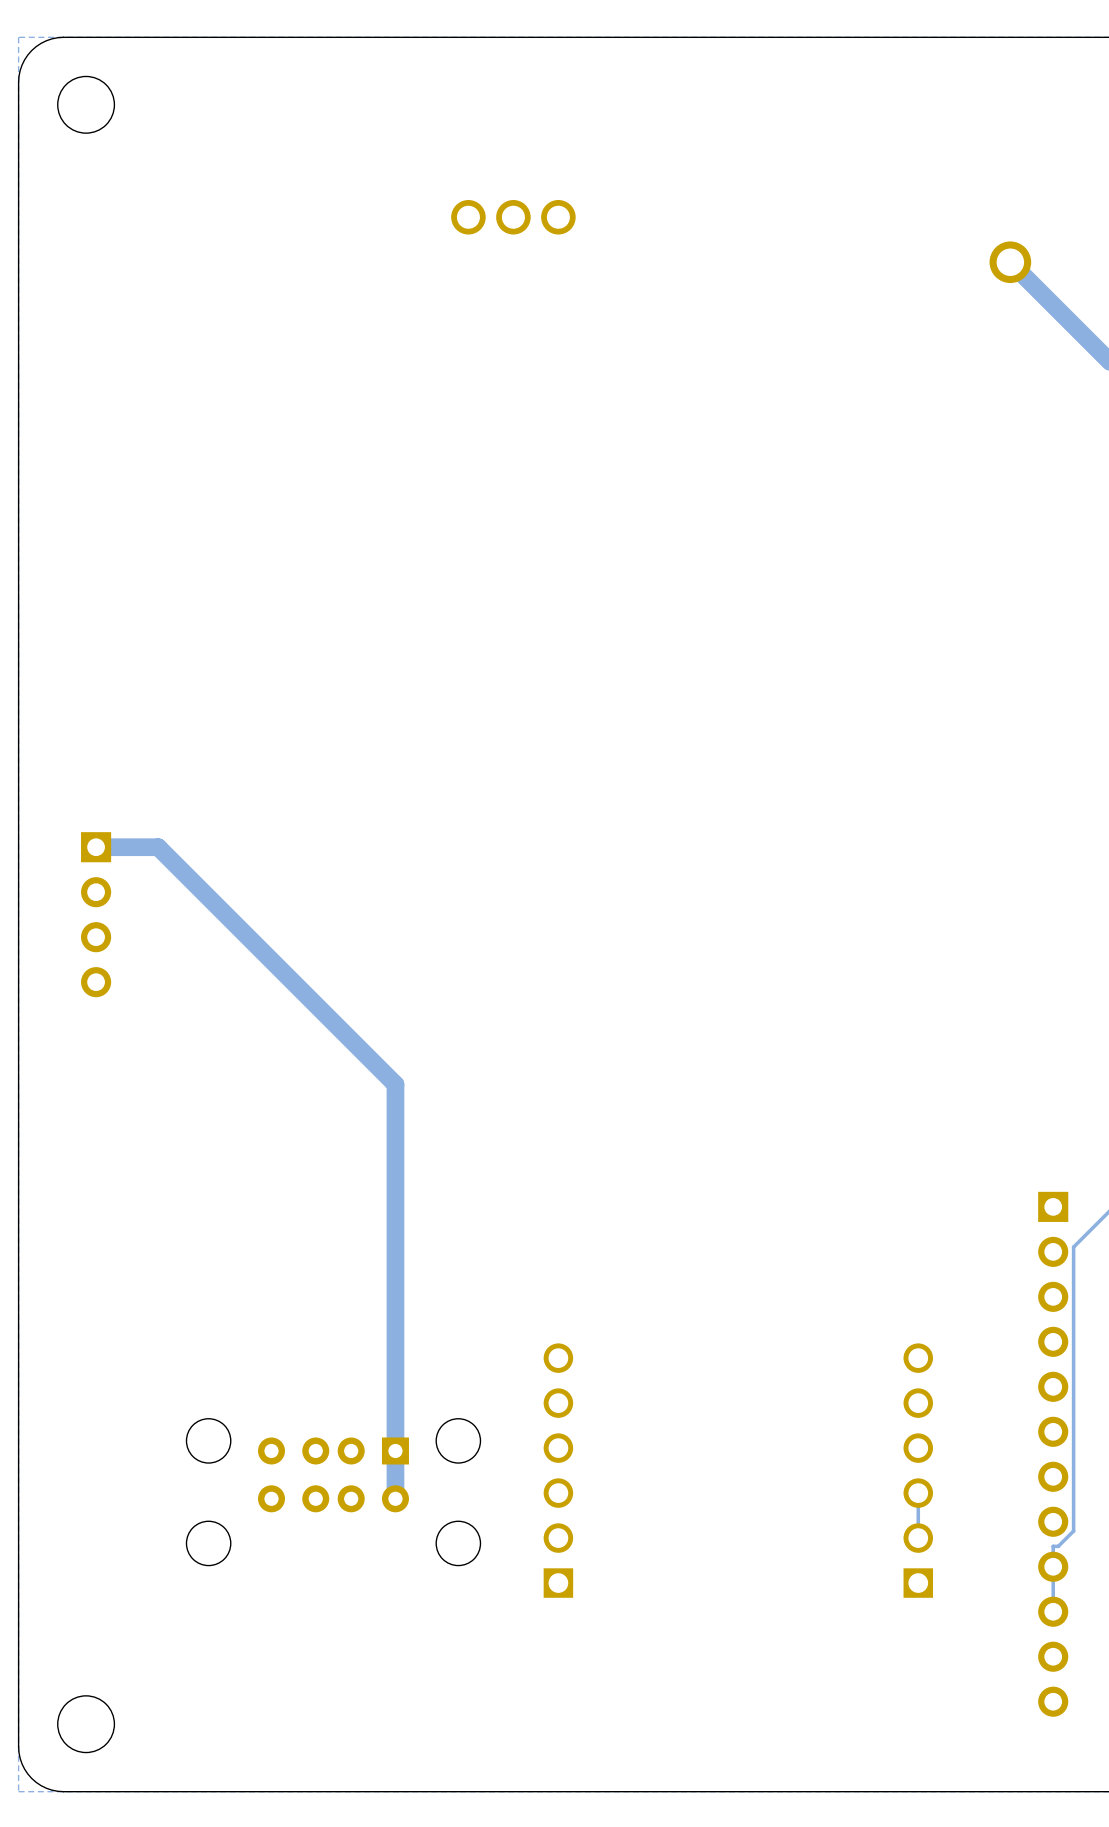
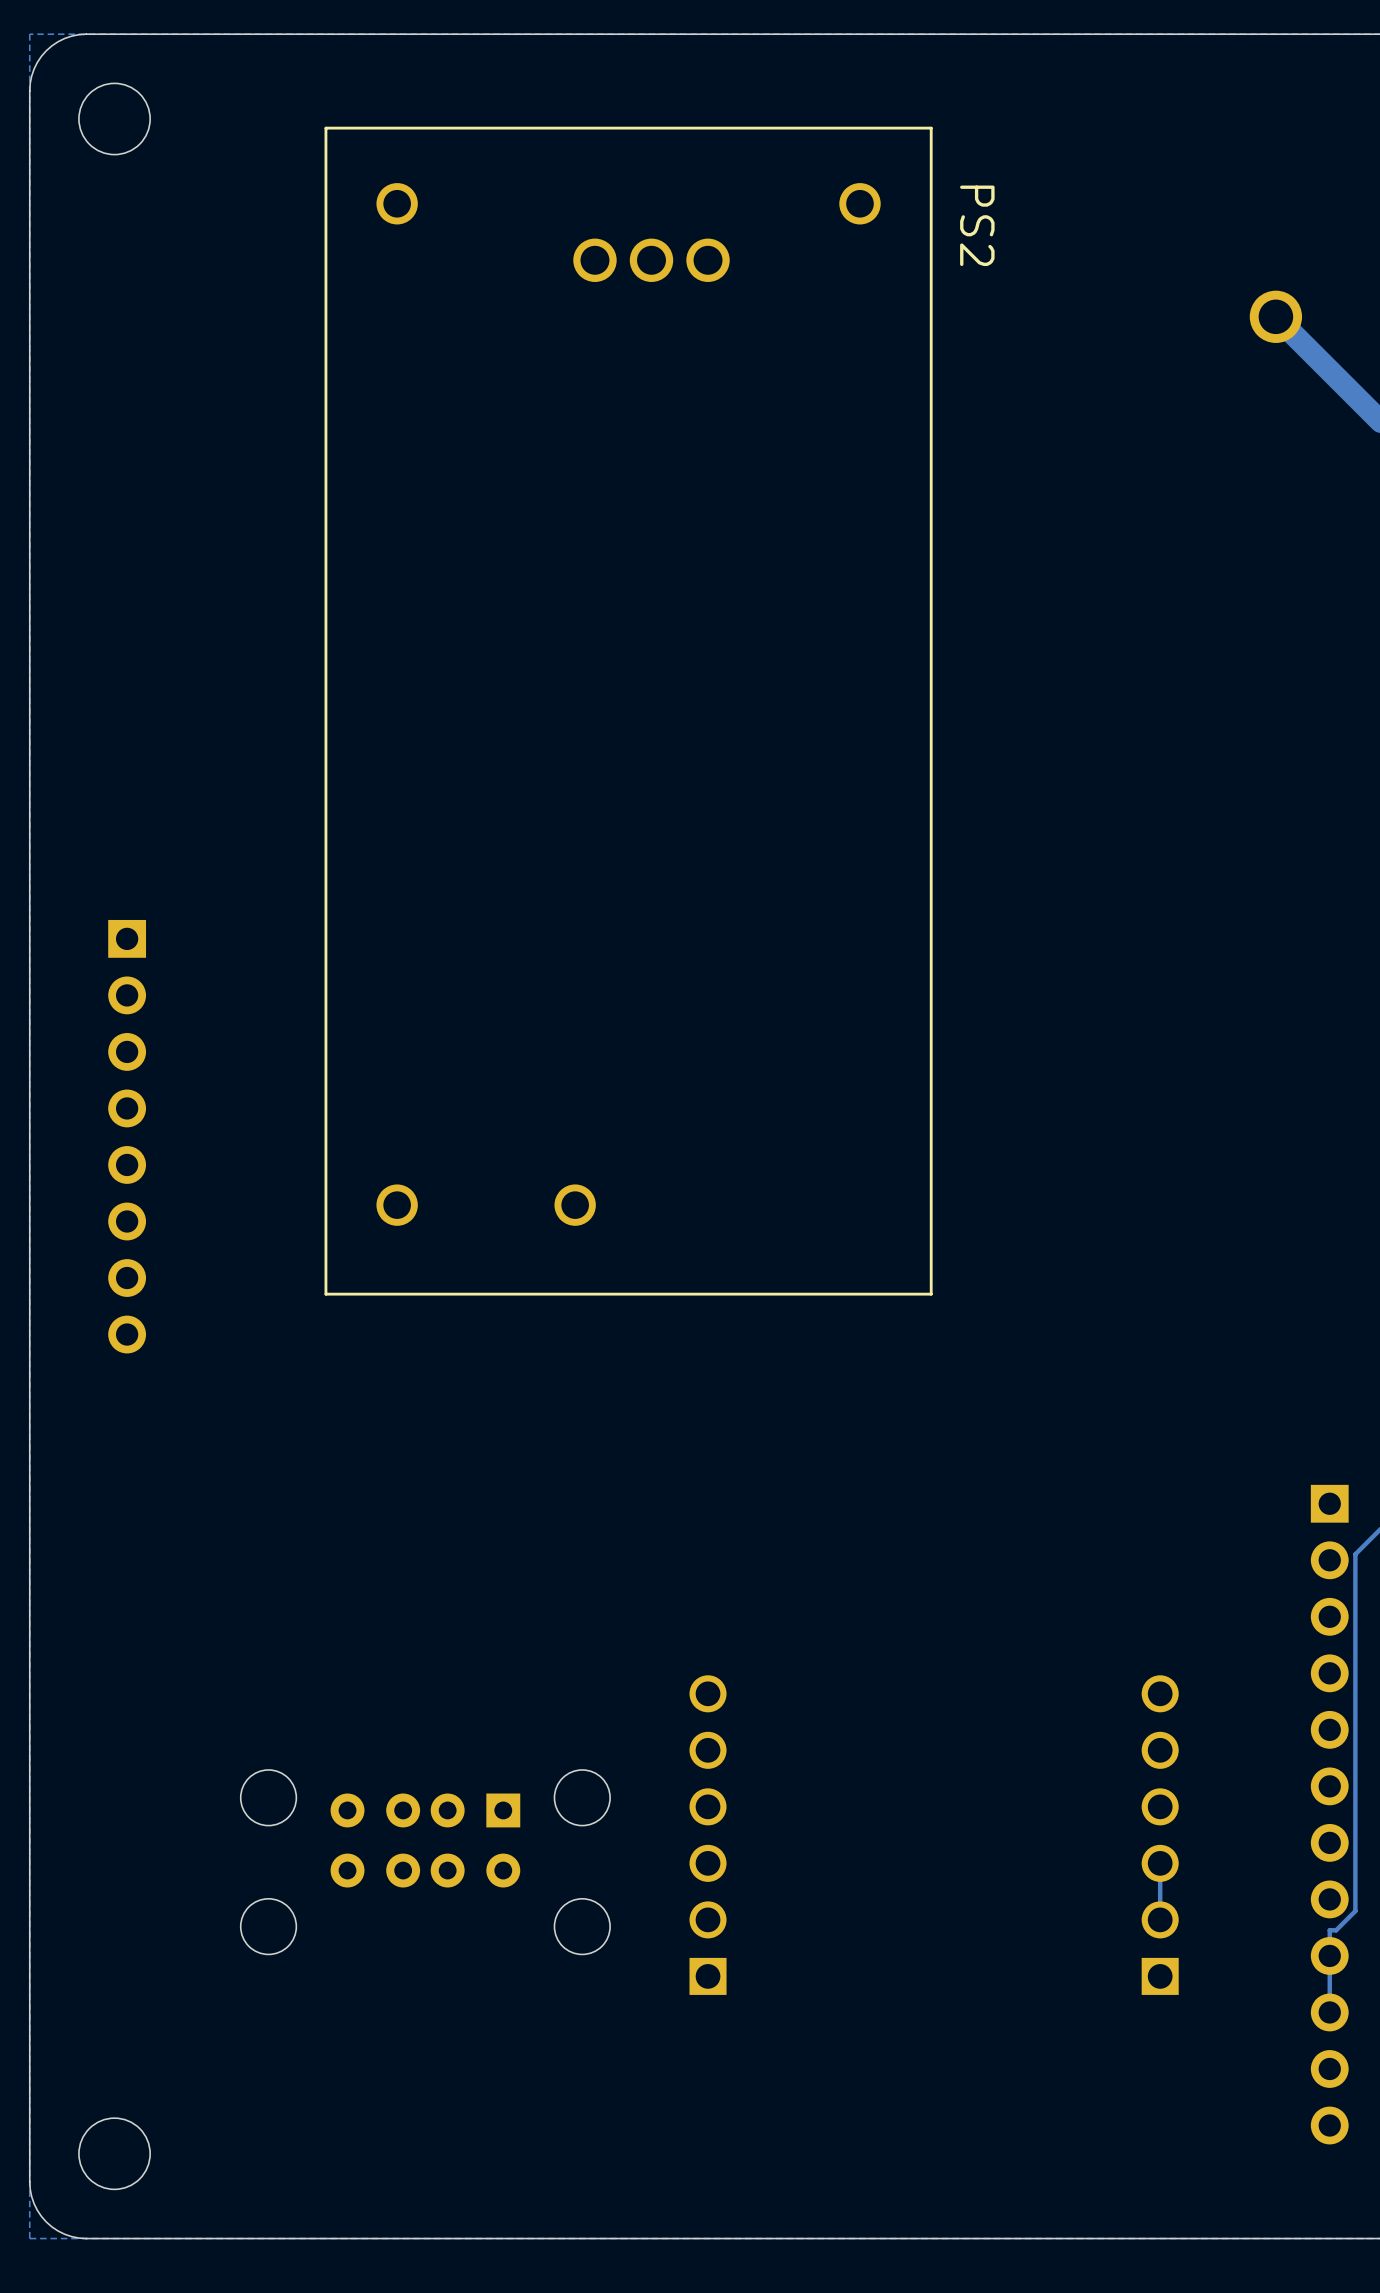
PS2: none -> (628, 711)
part footprint: [81, 832, 112, 998] -> [108, 919, 147, 1354]
track: (96, 847) (158, 847) (395, 1084) (395, 1498) -> none

